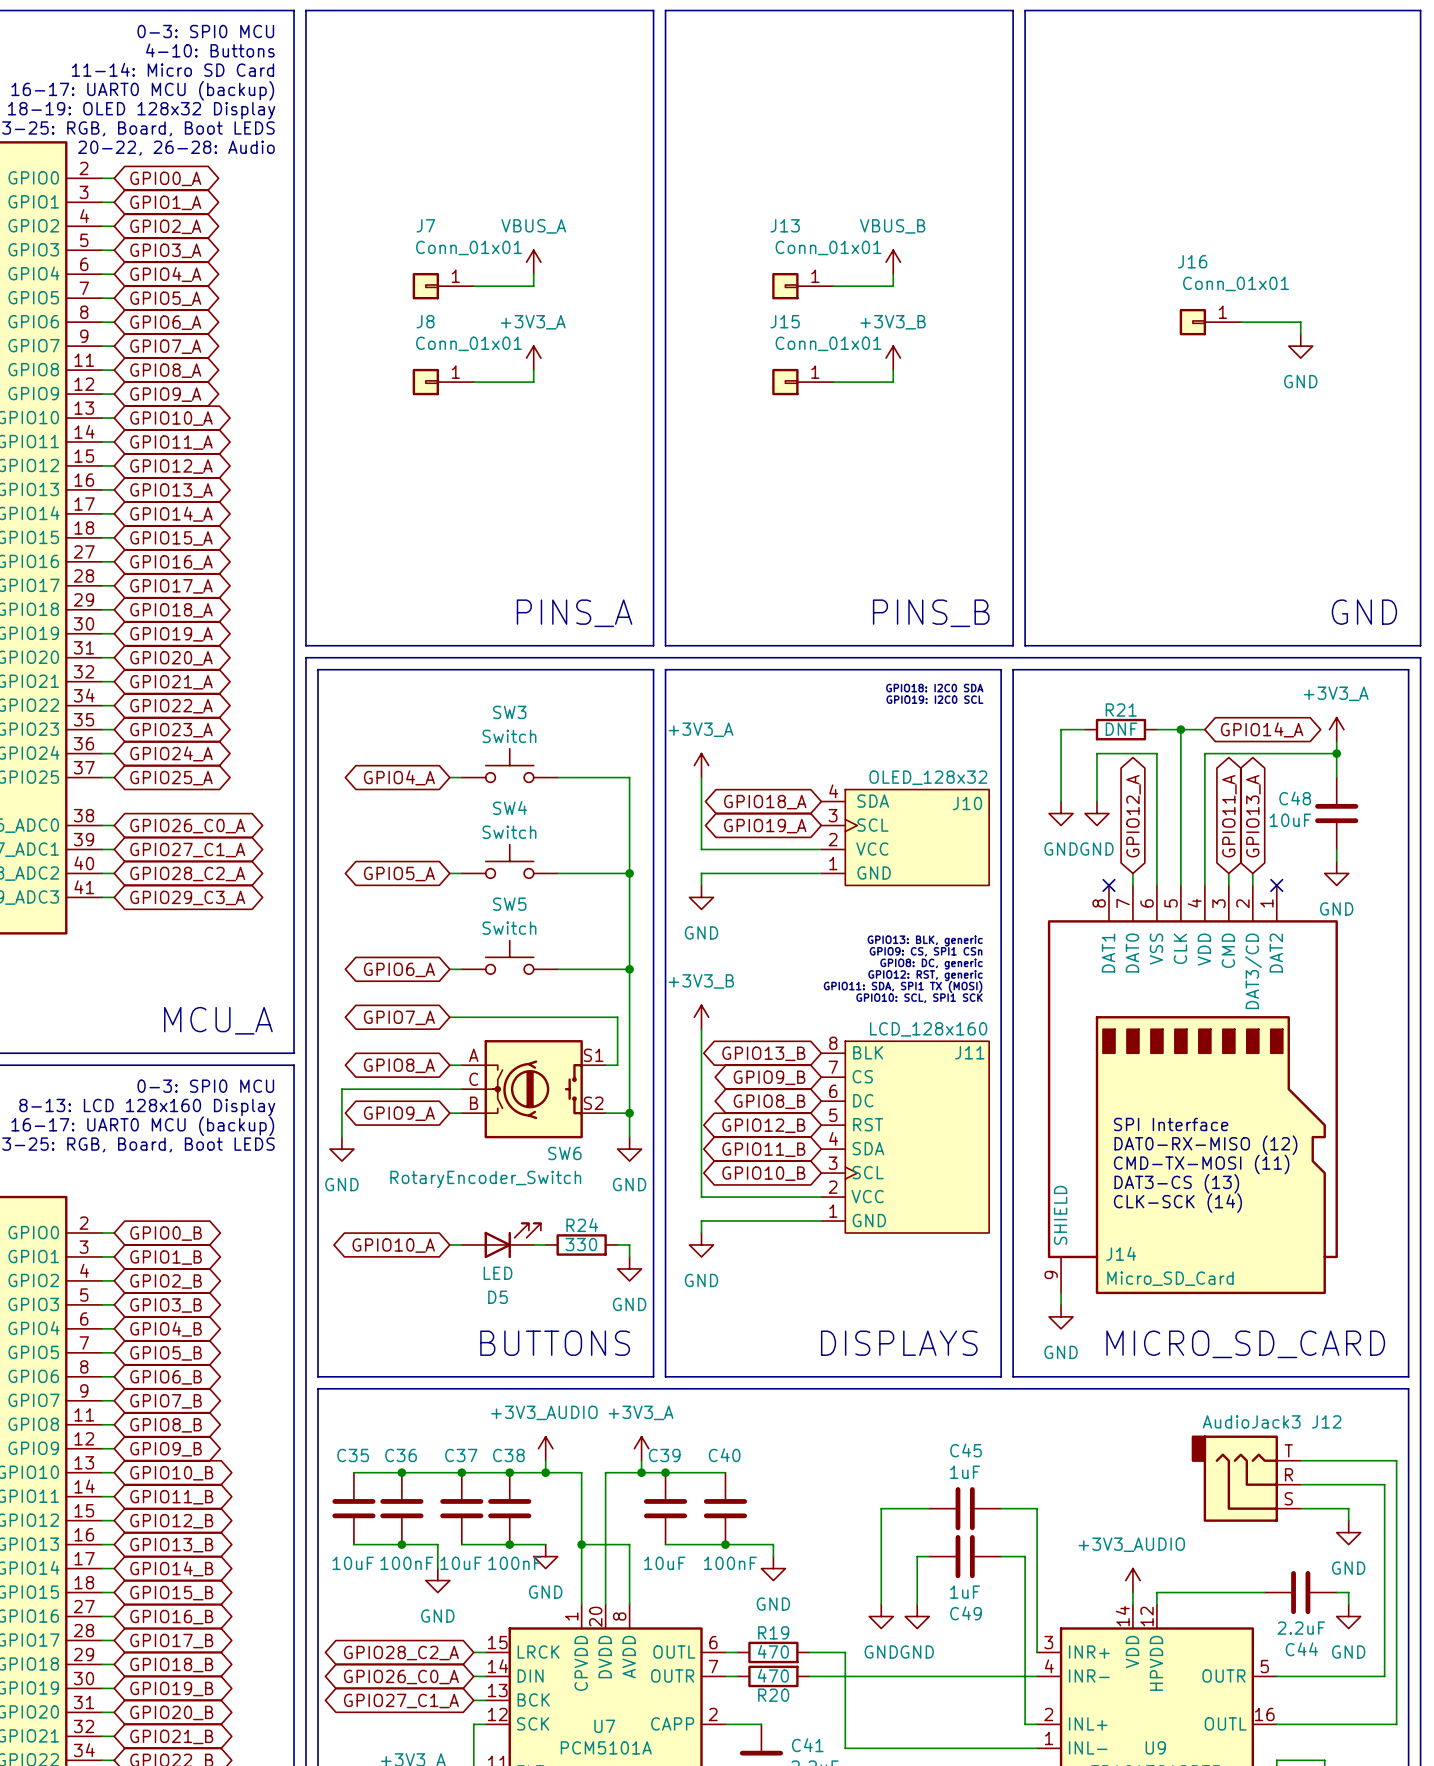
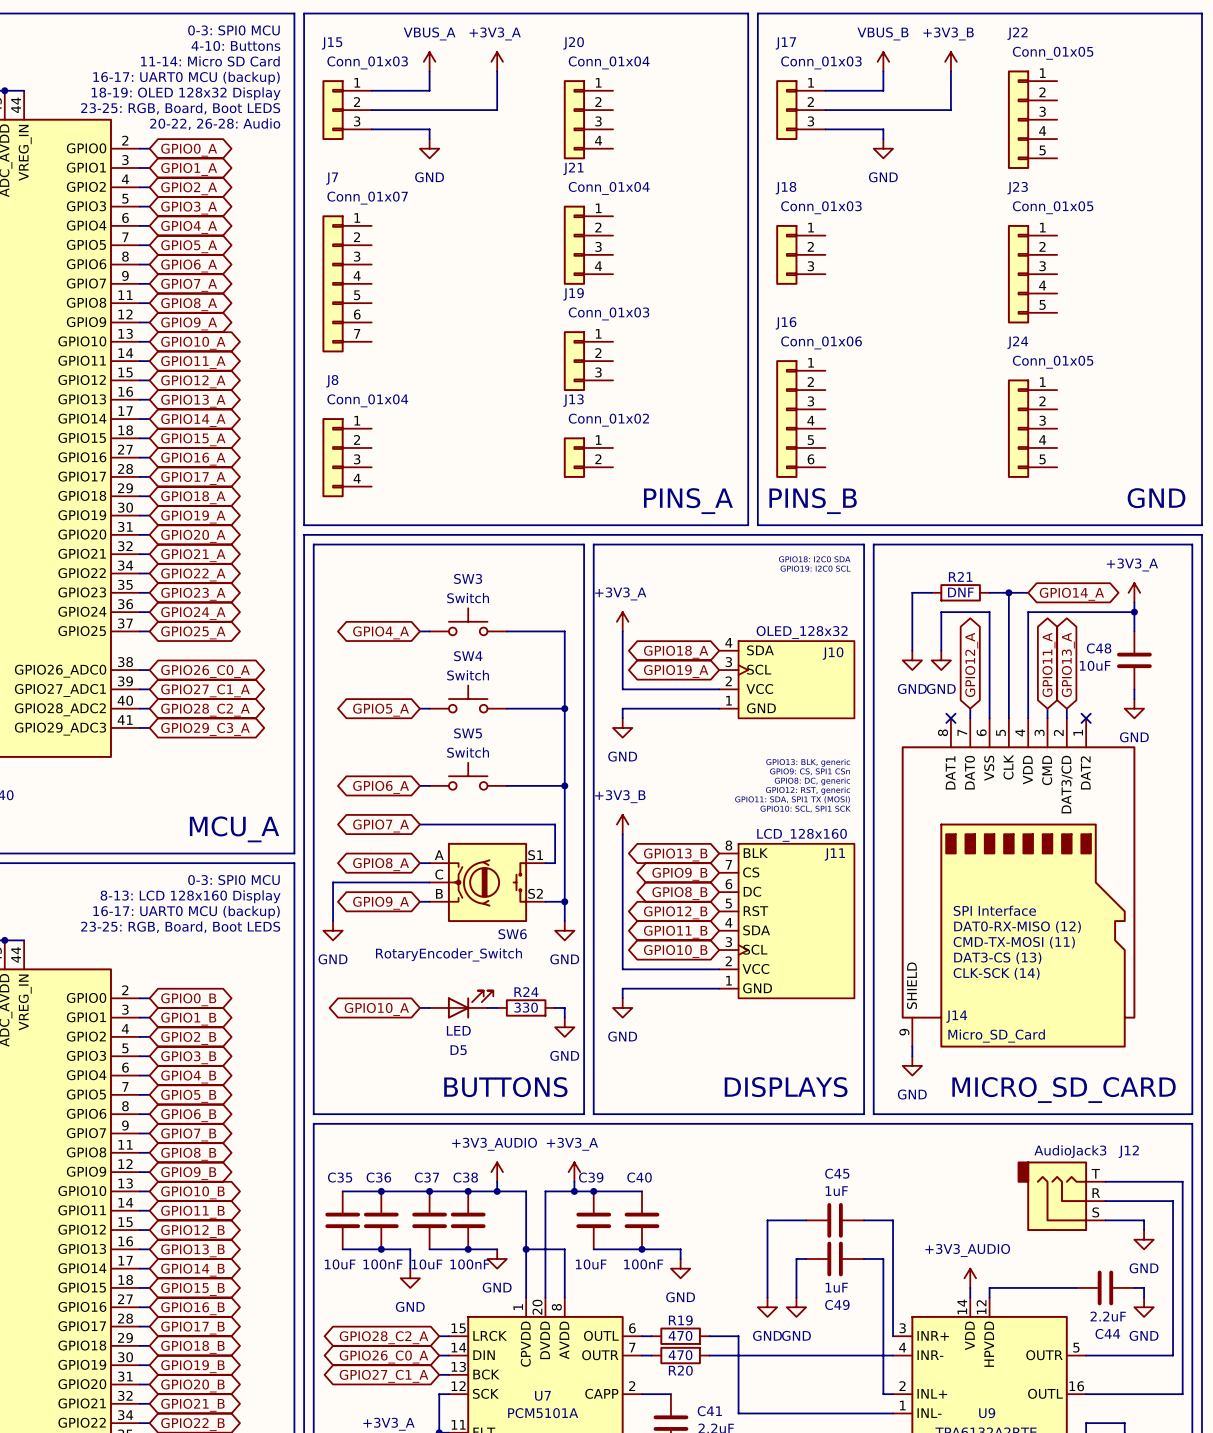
line: (653, 10) (653, 645) -> (584, 13) (593, 13)
line: (665, 10) (665, 645) -> (584, 525) (593, 525)
line: (857, 10) (869, 10) -> (748, 13) (748, 525)
line: (1013, 10) (1013, 645) -> (873, 13) (883, 13)
line: (1025, 10) (1025, 645) -> (873, 525) (883, 525)
power symbol: none -> +3V3_A (497, 61)
power symbol: none -> +3V3_B (950, 61)
wire: none -> (429, 71) (429, 90) (371, 90)
wire: none -> (497, 71) (497, 110) (371, 110)
wire: none -> (883, 71) (883, 90) (825, 90)
wire: none -> (950, 71) (950, 110) (825, 110)
J17: none -> Conn_01x03 (800, 110)
J20: none -> Conn_01x04 (588, 119)
J22: none -> Conn_01x05 (1032, 119)
wire: none -> (371, 129) (429, 129) (429, 139)
wire: none -> (825, 129) (883, 129) (883, 139)
power symbol: none -> GND (429, 148)
power symbol: none -> GND (883, 148)
J7 name position: J7 (425, 225) -> J7 (332, 178)
J7 value: Conn_01x01 (468, 247) -> Conn_01x07 (367, 198)
J13 value: Conn_01x01 (828, 247) -> Conn_01x02 (608, 420)
J16 name position: J16 (1192, 261) -> J16 (786, 323)
power symbol position: VBUS_A (533, 262) -> VBUS_A (429, 61)
power symbol position: VBUS_B (893, 262) -> VBUS_B (883, 61)
J7 symbol: [412, 273, 474, 300] -> [322, 215, 372, 353]
J13 symbol: [772, 273, 834, 300] -> [563, 437, 614, 478]
wire: (533, 274) (533, 286) (473, 286) -> none
wire: (893, 274) (893, 286) (833, 286) -> none
J16 value: Conn_01x01 (1236, 283) -> Conn_01x06 (821, 342)
J21: none -> Conn_01x04 (588, 245)
J16 symbol: [1179, 308, 1241, 336] -> [776, 360, 826, 478]
J18: none -> Conn_01x03 (800, 254)
J8 name position: J8 (425, 321) -> J8 (332, 381)
J15 name position: J15 (785, 321) -> J15 (332, 43)
wire: (1240, 322) (1300, 322) (1300, 334) -> none
J23: none -> Conn_01x05 (1032, 274)
J8 value: Conn_01x01 (468, 343) -> Conn_01x04 (367, 400)
J15 value: Conn_01x01 (828, 343) -> Conn_01x03 (367, 62)
power symbol: GND (1300, 346) -> none
power symbol: +3V3_A (533, 358) -> none
power symbol: +3V3_B (893, 358) -> none
J8 symbol: [412, 368, 474, 396] -> [322, 418, 372, 498]
J15 symbol: [772, 368, 834, 396] -> [322, 80, 372, 141]
wire: (533, 370) (533, 382) (473, 382) -> none
wire: (893, 370) (893, 382) (833, 382) -> none
J19: none -> Conn_01x03 (588, 361)
J24: none -> Conn_01x05 (1032, 428)
text position: PINS_A (574, 613) -> PINS_A (688, 501)
line: (857, 645) (869, 645) -> (757, 13) (757, 525)

